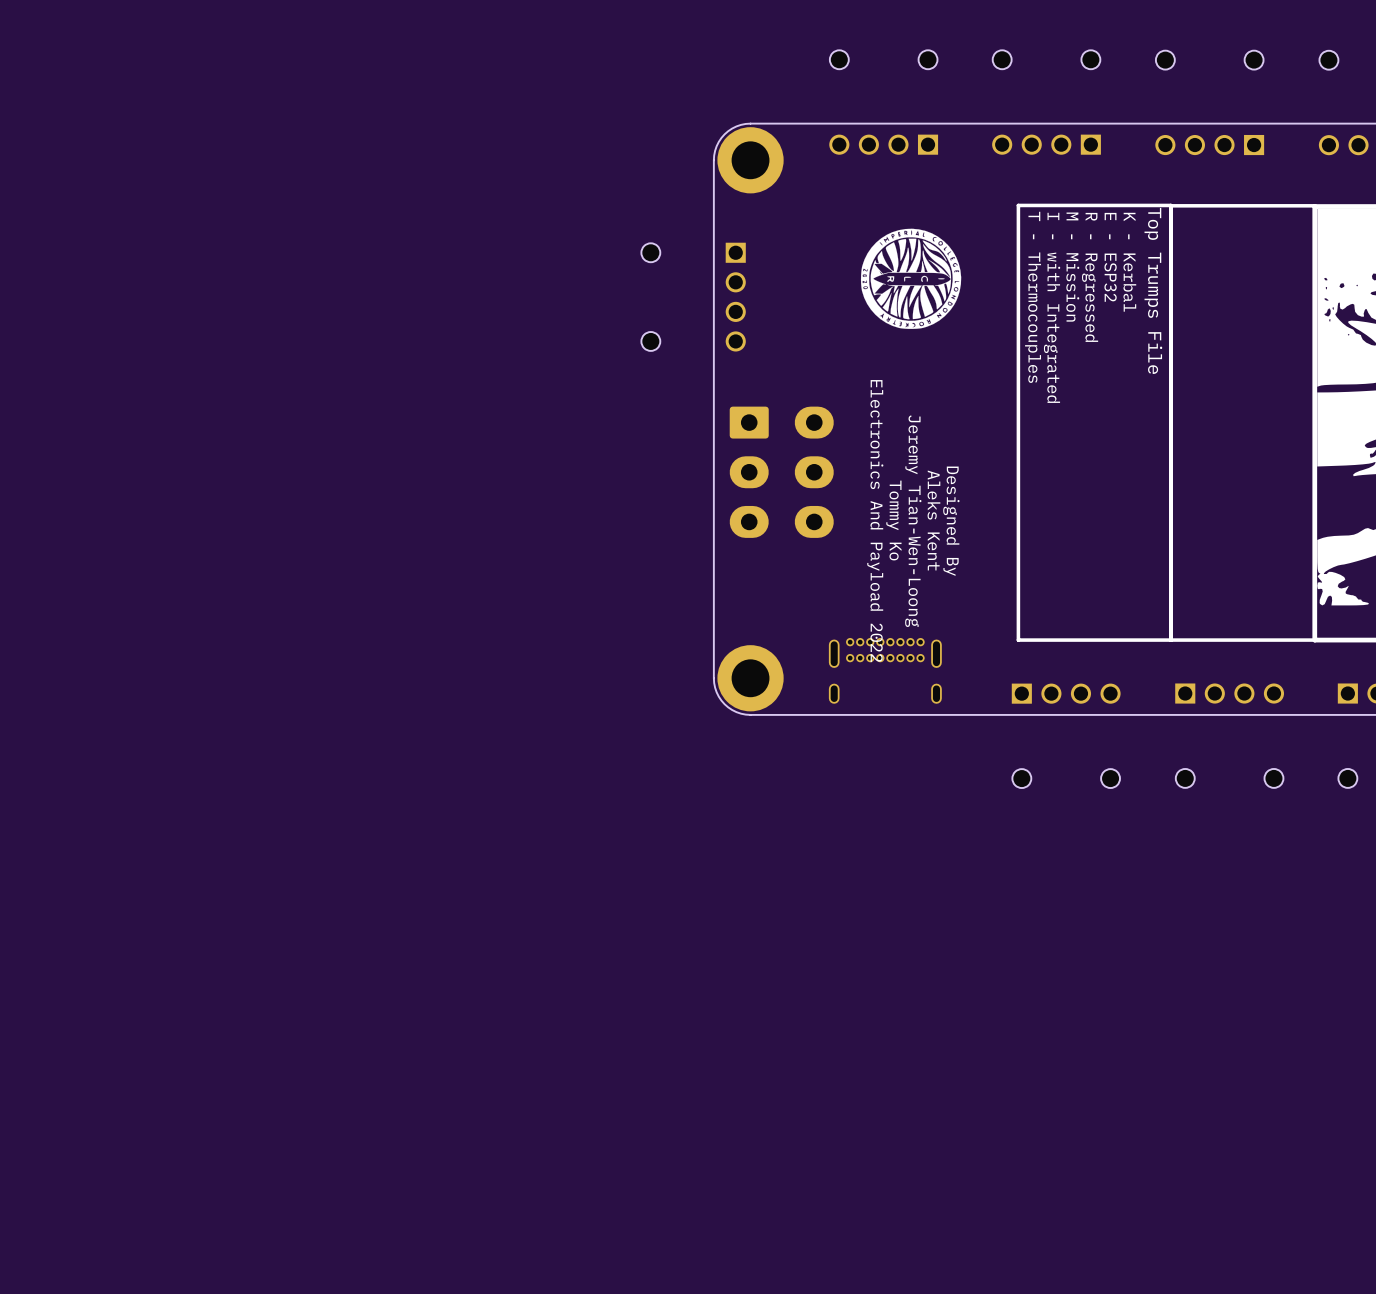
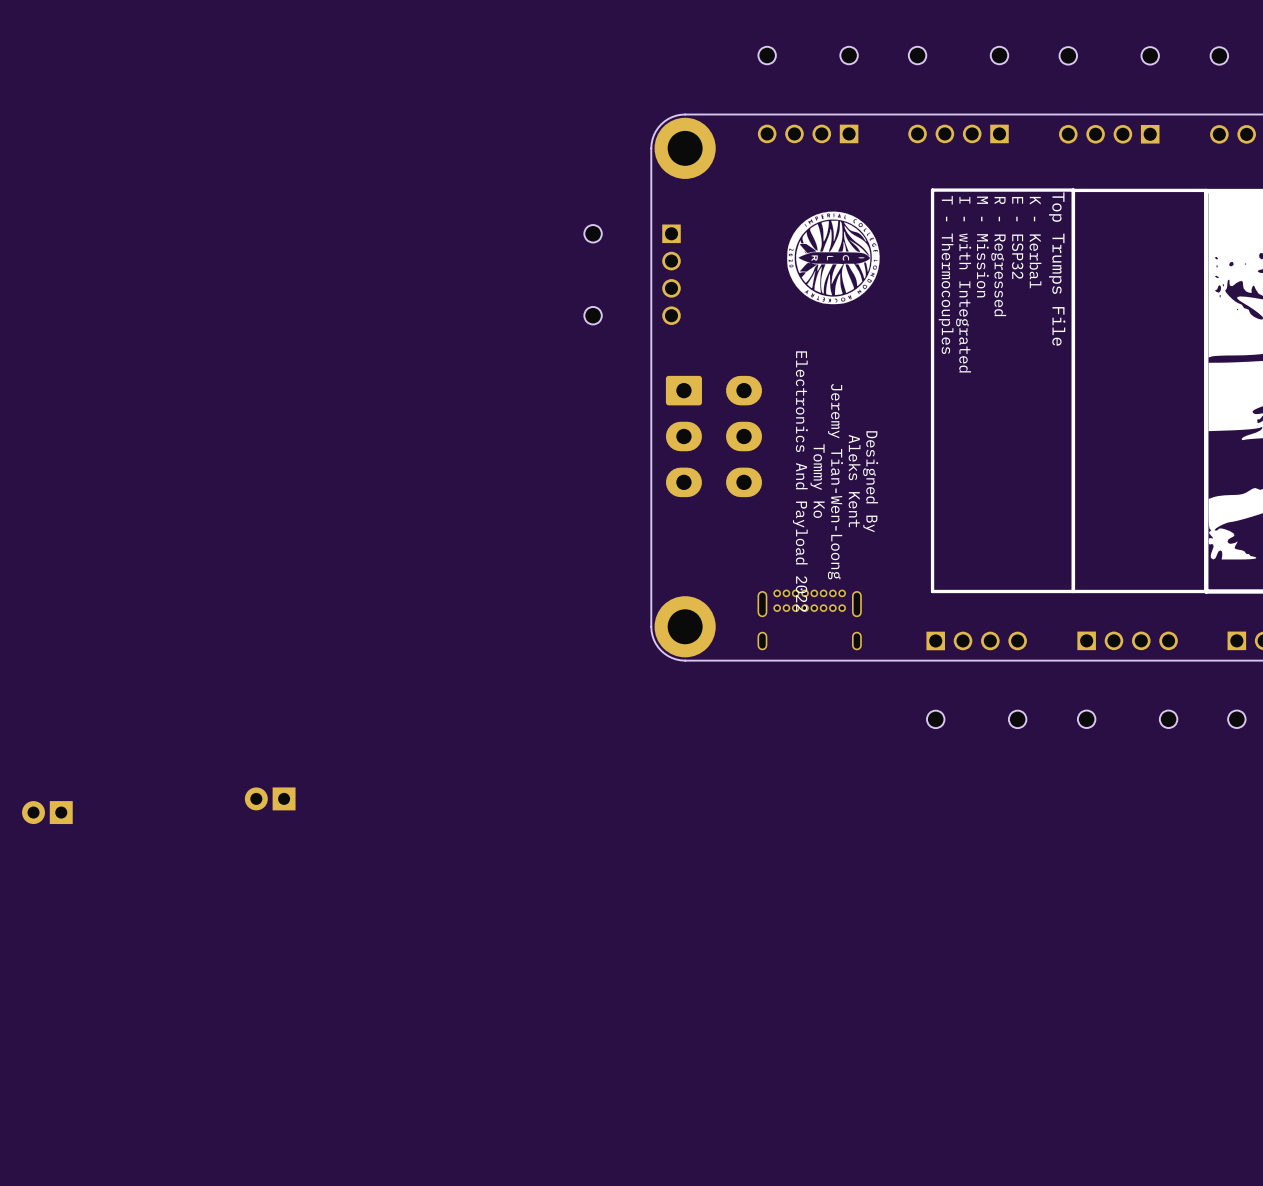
part: none -> (270, 798)
part: none -> (47, 812)

